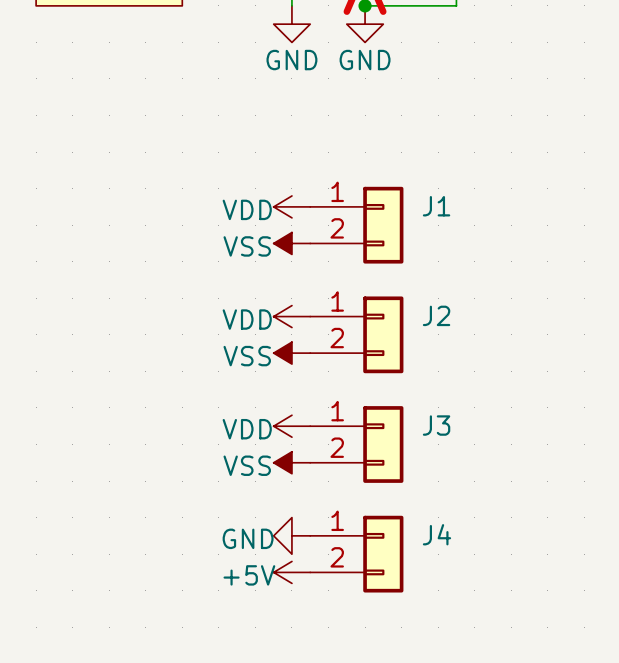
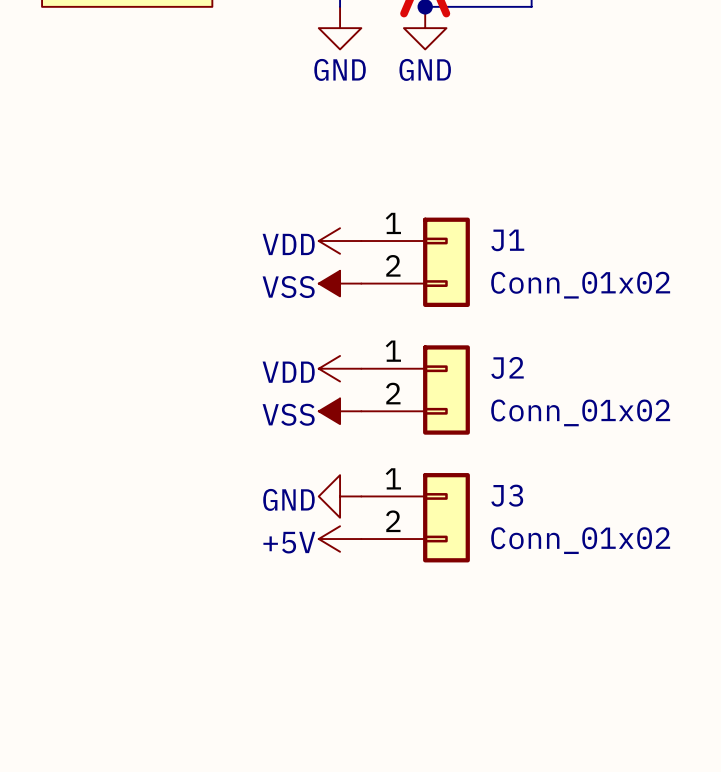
J1 value: none -> Conn_01x02 (580, 285)
J2 value: none -> Conn_01x02 (580, 412)
power symbol: VDD (291, 426) -> GND (340, 496)
power symbol: VSS (291, 462) -> +5V (340, 539)
J3 value: none -> Conn_01x02 (580, 540)
power symbol: GND (291, 535) -> none
J4: (356, 554) -> none
power symbol: +5V (291, 572) -> none

